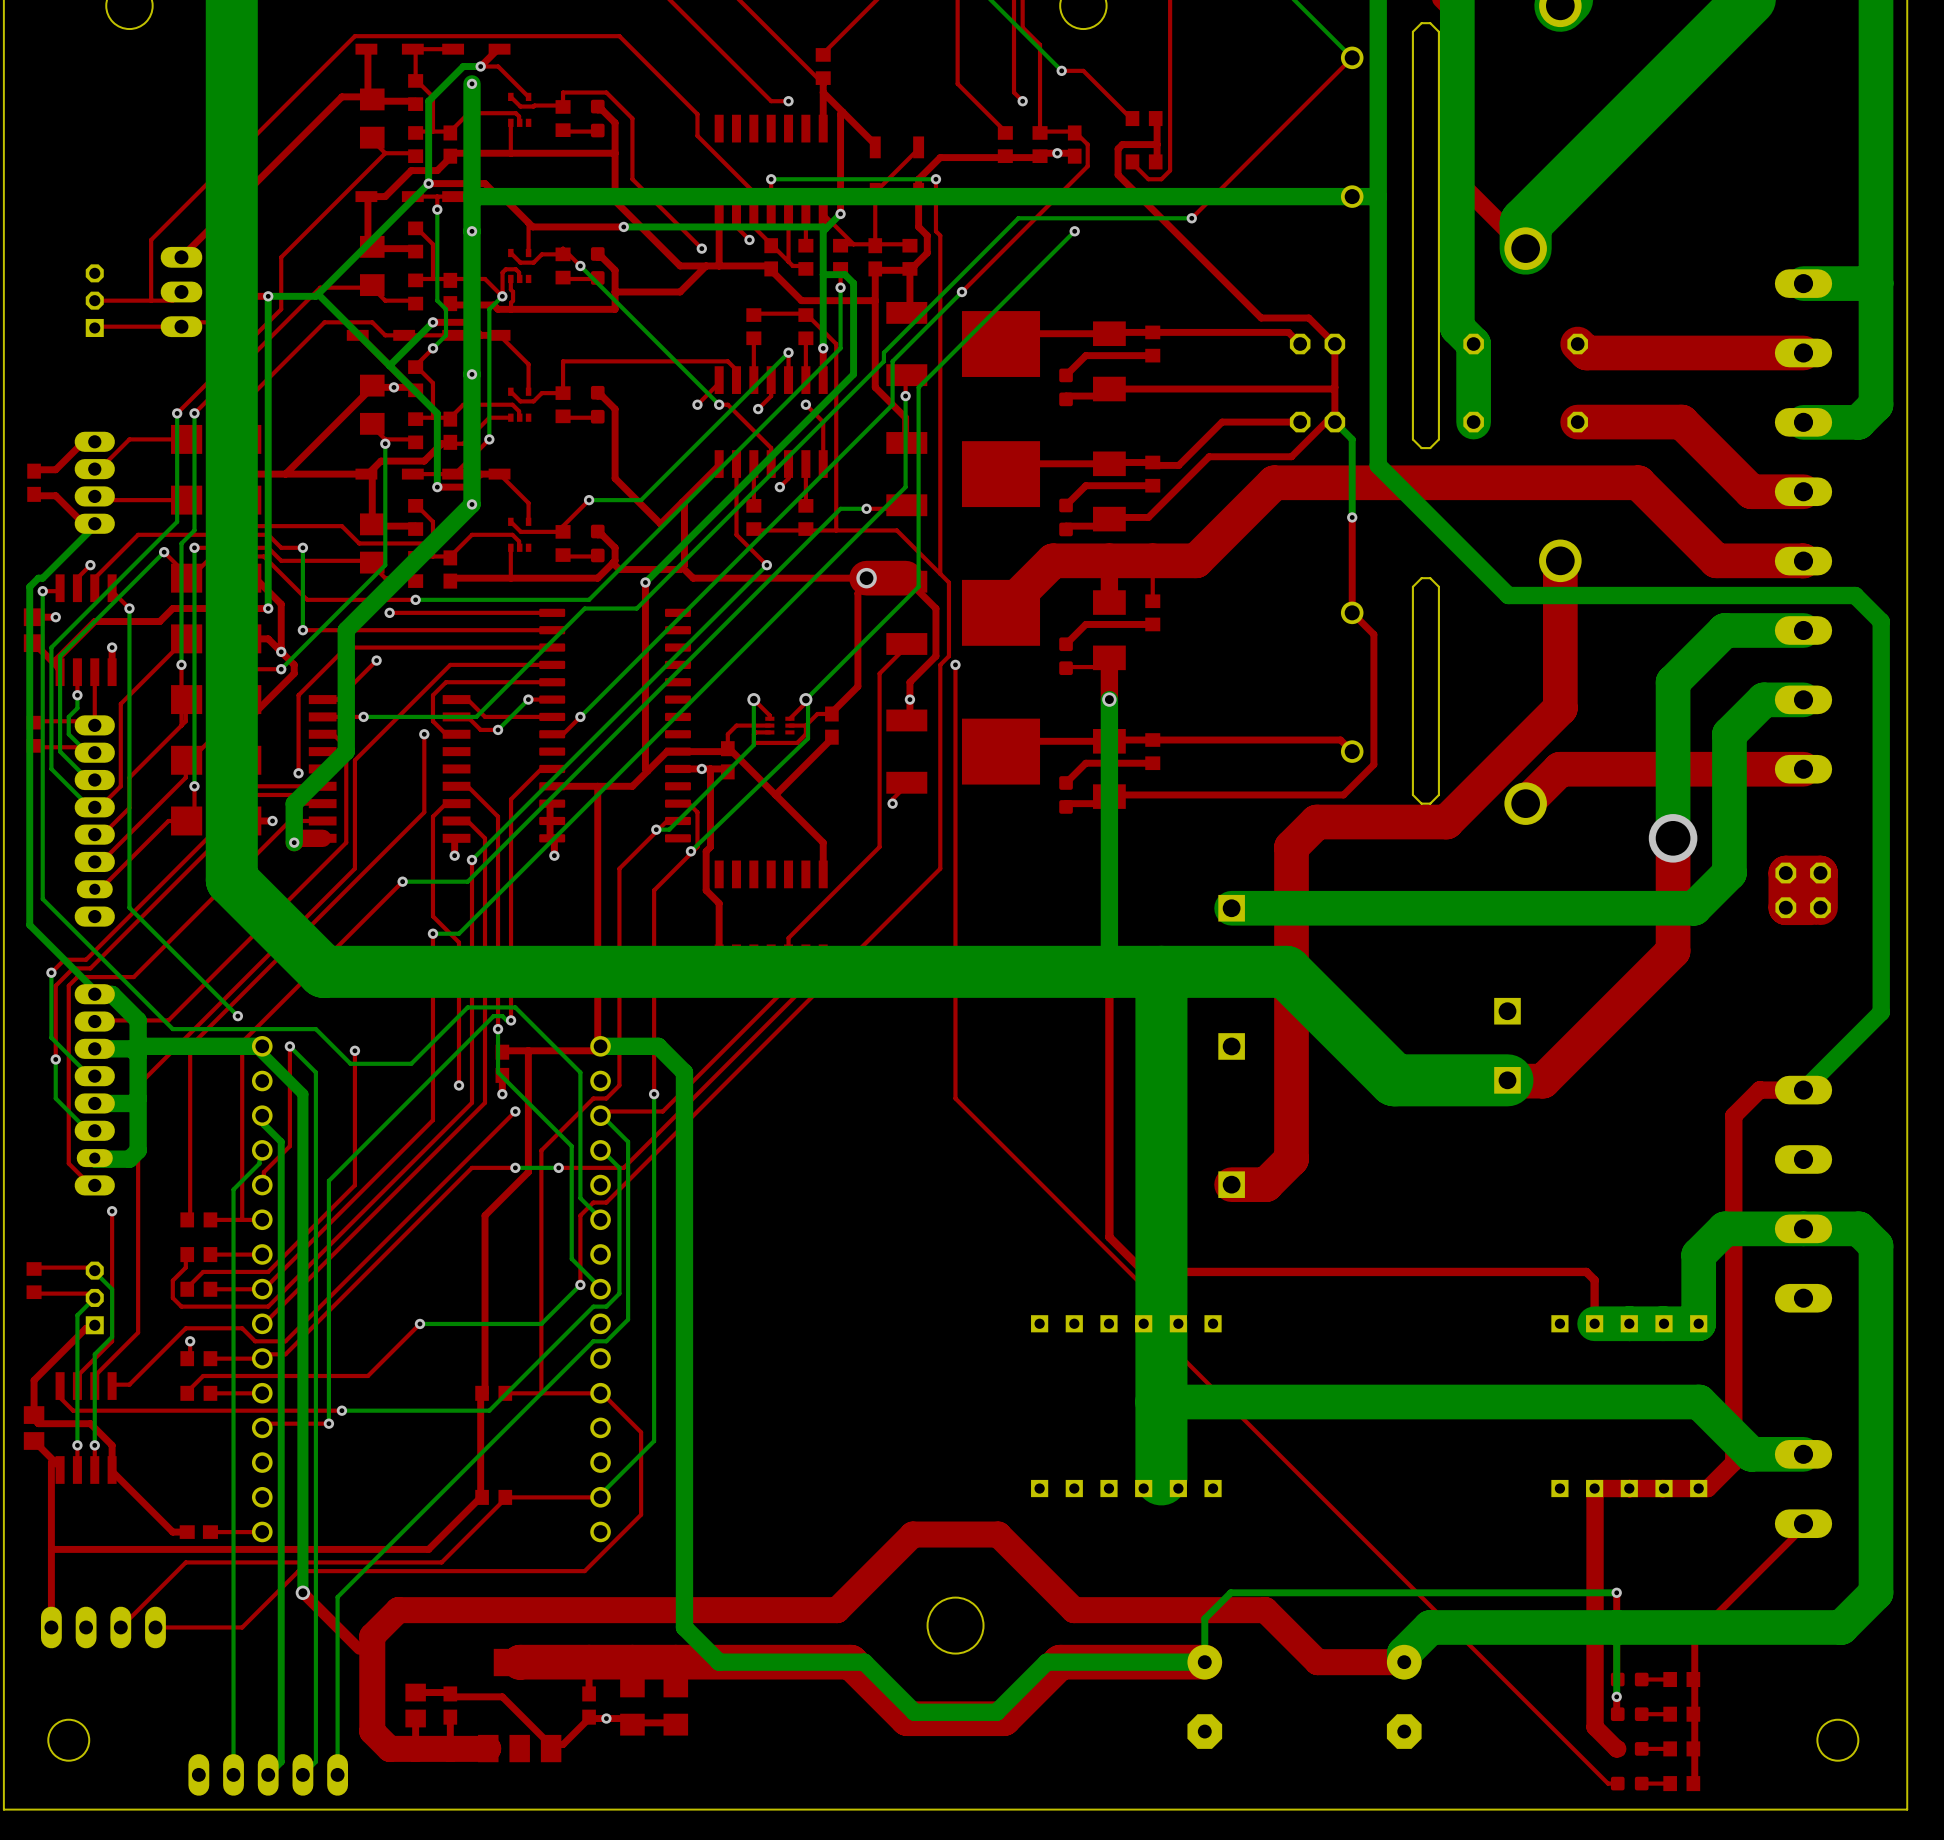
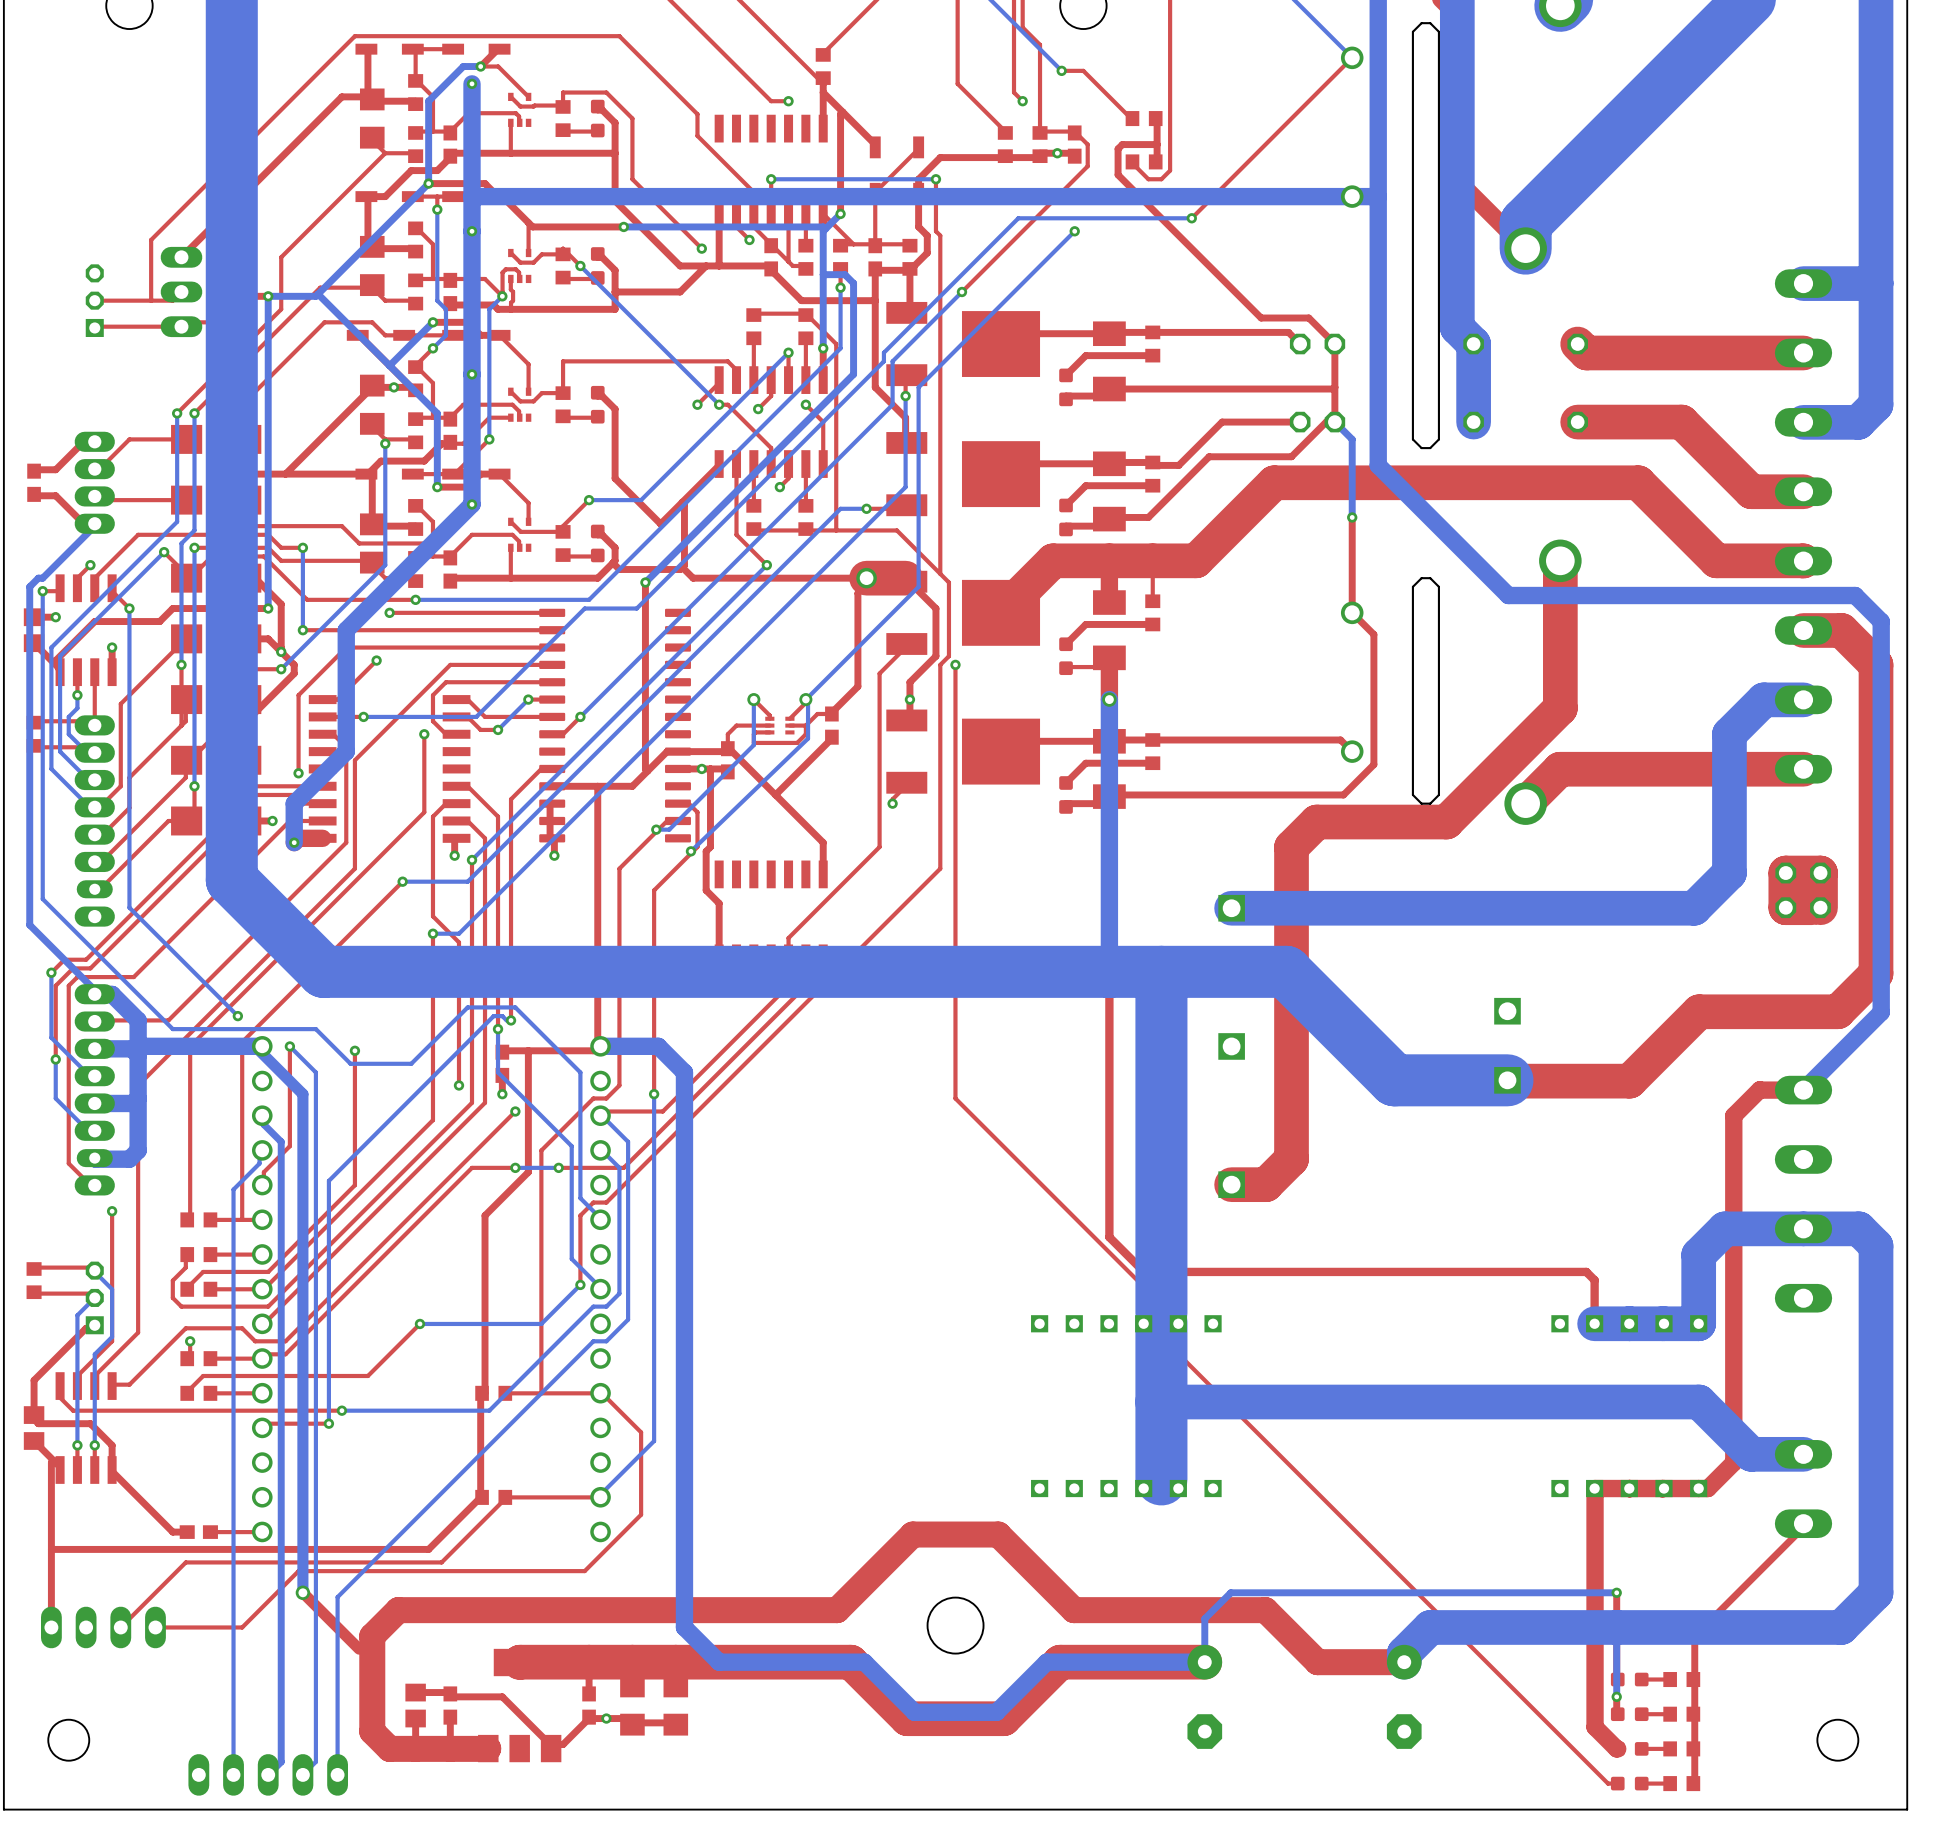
bottom track: (1803, 630) (1724, 630) (1673, 682) (1673, 838) -> none
top track: (1673, 838) (1673, 951) (1543, 1081) -> (1803, 630) (1841, 630) (1876, 664) (1876, 973) (1837, 1011) (1699, 1011) (1629, 1081) (1543, 1081)
via: (1673, 838) -> none

